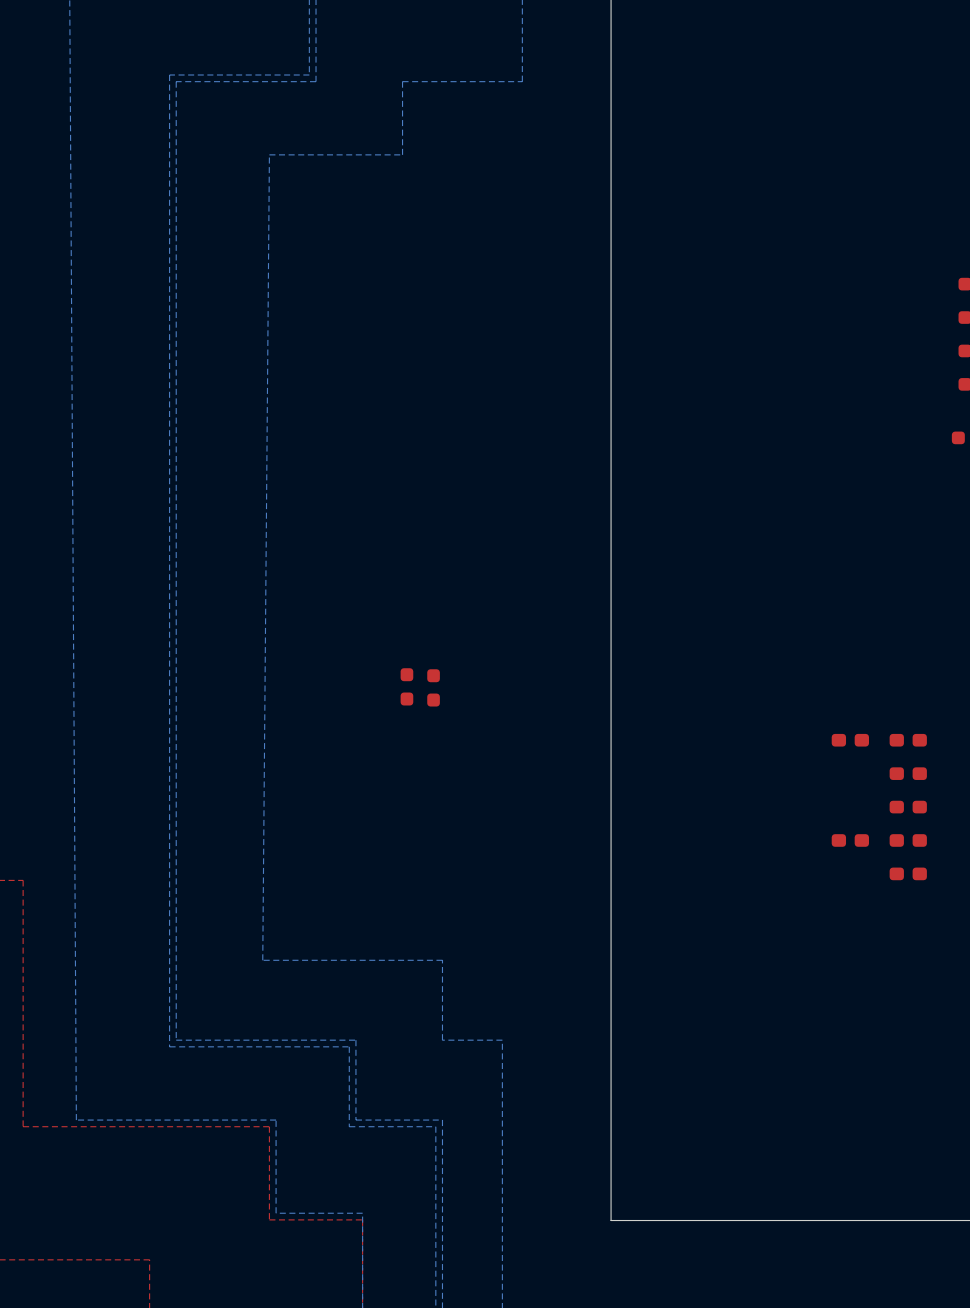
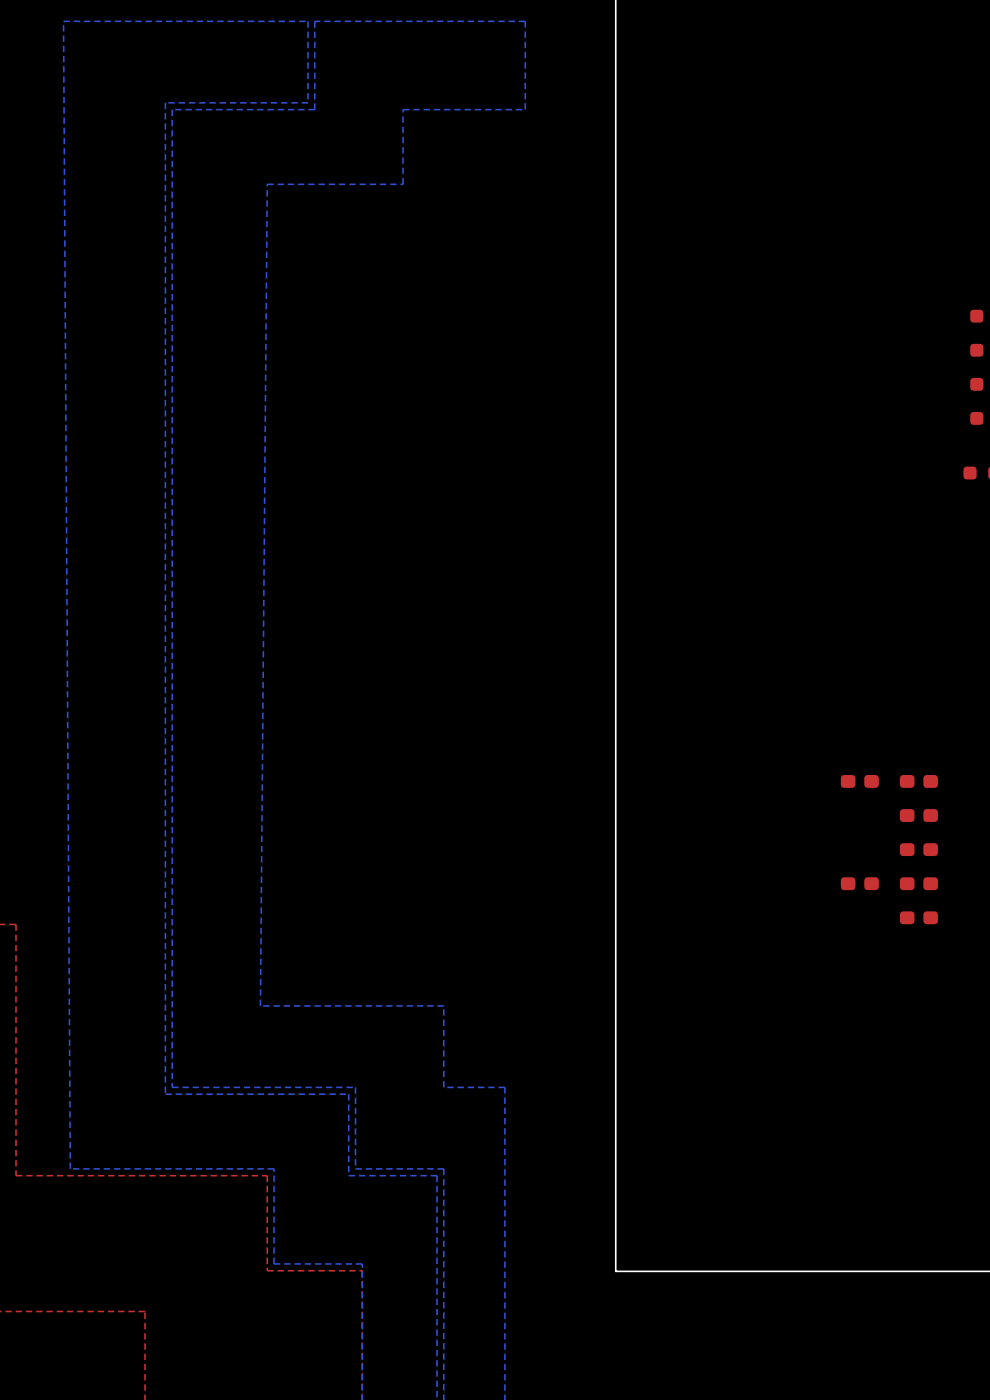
part: (406, 686) -> none
part: (433, 687) -> none

